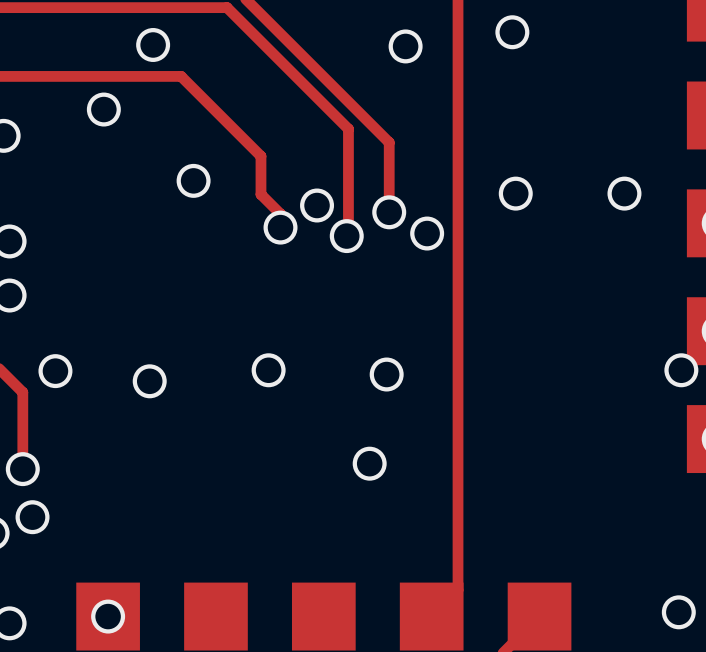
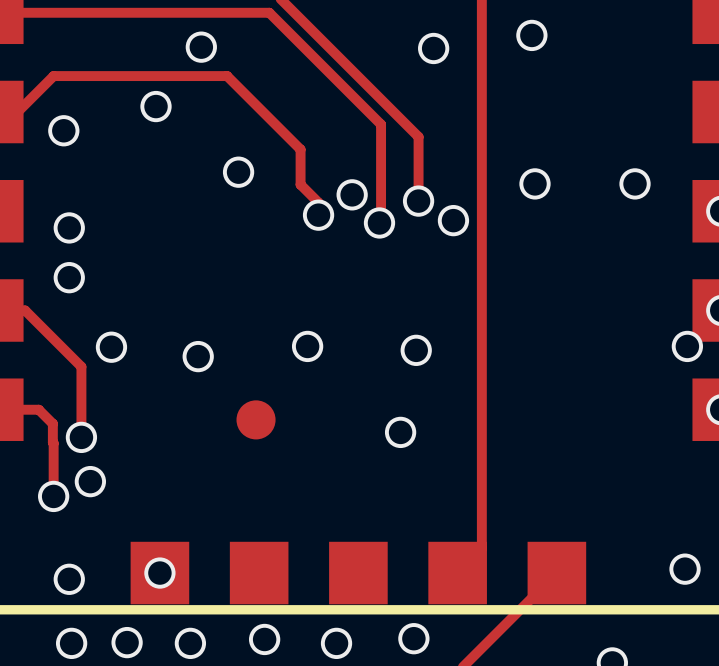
part: none -> (256, 419)

